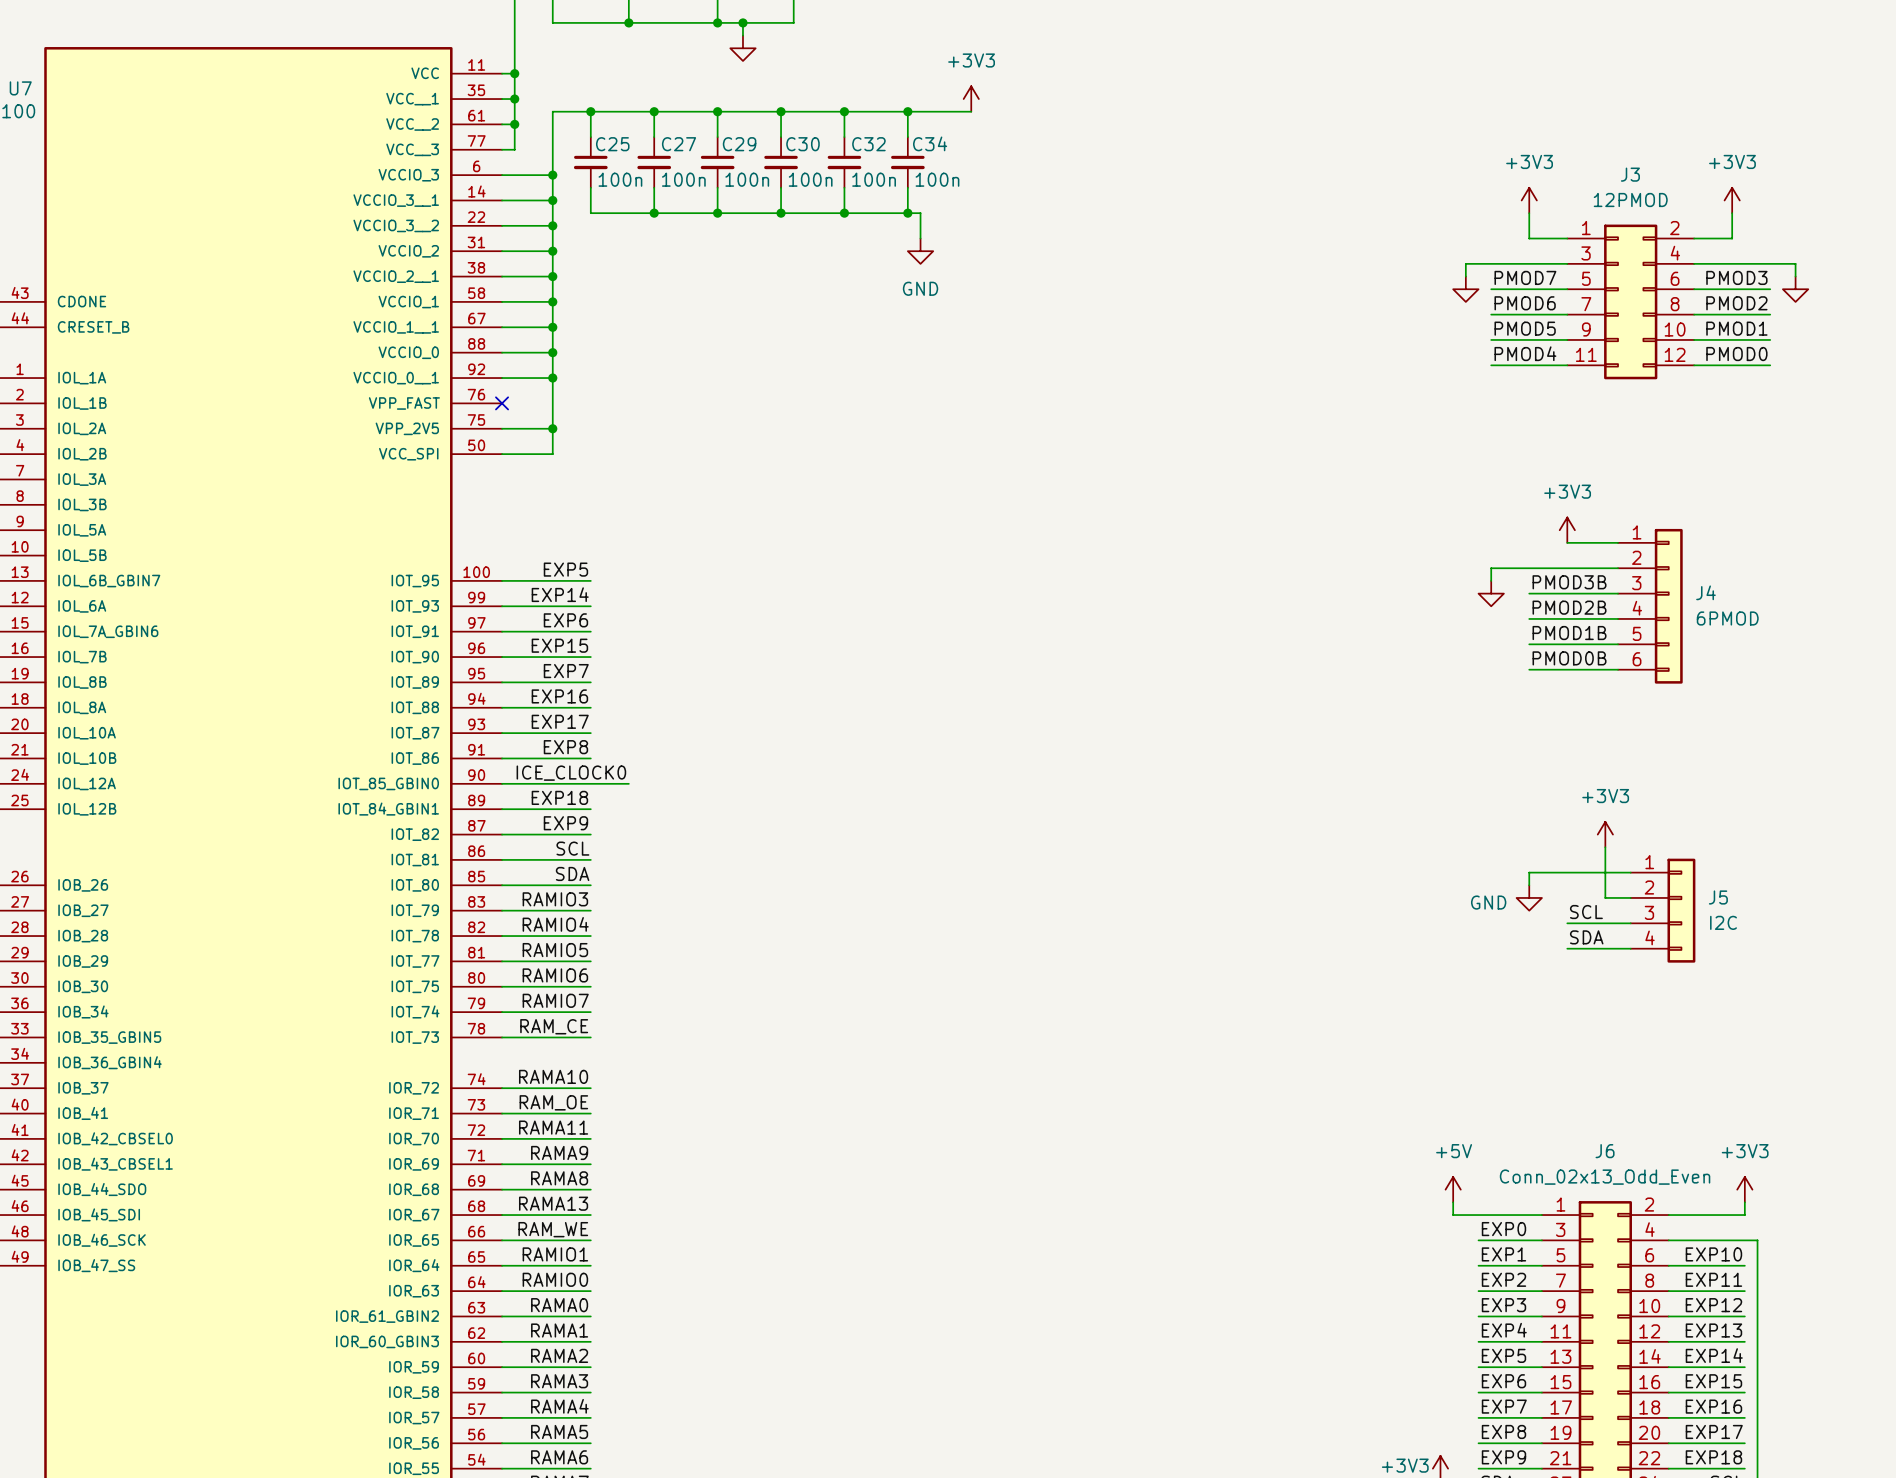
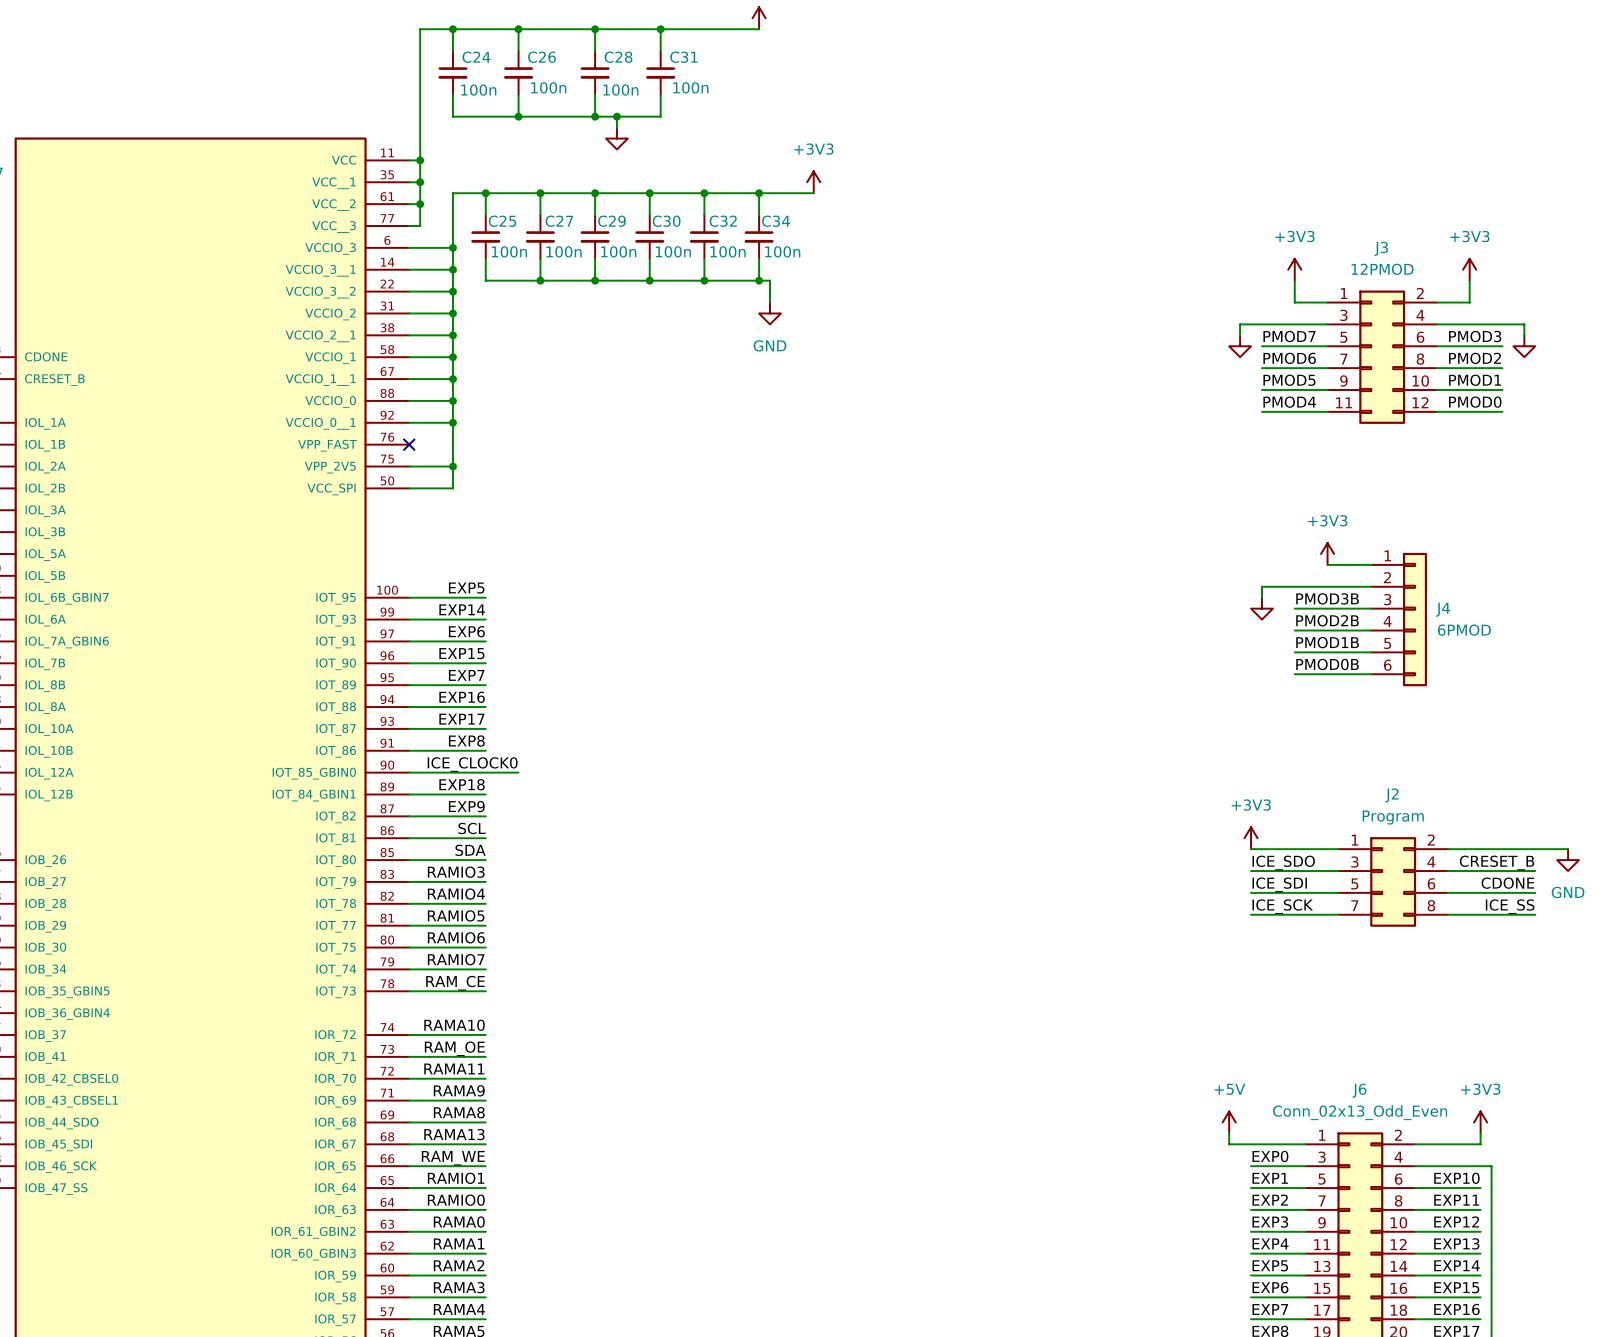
power symbol position: +3V3 (1605, 834) -> +3V3 (1251, 838)
wire: (1605, 847) (1605, 897) (1630, 897) -> none
wire: (1529, 872) (1529, 885) -> (1294, 849) (1251, 849)
wire: none -> (1447, 849) (1568, 849)
power symbol: none -> GND (1568, 860)
label: none -> ICE_SDO (1283, 862)
label: none -> CRESET_B (1497, 862)
wire: none -> (1251, 871) (1338, 871)
power symbol: GND (1529, 897) -> none
wire: none -> (1447, 871) (1535, 871)
J2: none -> Program (1393, 881)
J5: I2C (1663, 910) -> none
label: none -> ICE_SDI (1279, 884)
label: SCL (1586, 912) -> none
label: none -> CDONE (1507, 883)
wire: none -> (1251, 892) (1327, 892)
wire: none -> (1447, 892) (1535, 892)
label: none -> ICE_SCK (1282, 906)
label: SDA (1586, 937) -> none
label: none -> ICE_SS (1510, 906)
wire: none -> (1251, 914) (1327, 914)
wire: none -> (1447, 914) (1535, 914)

